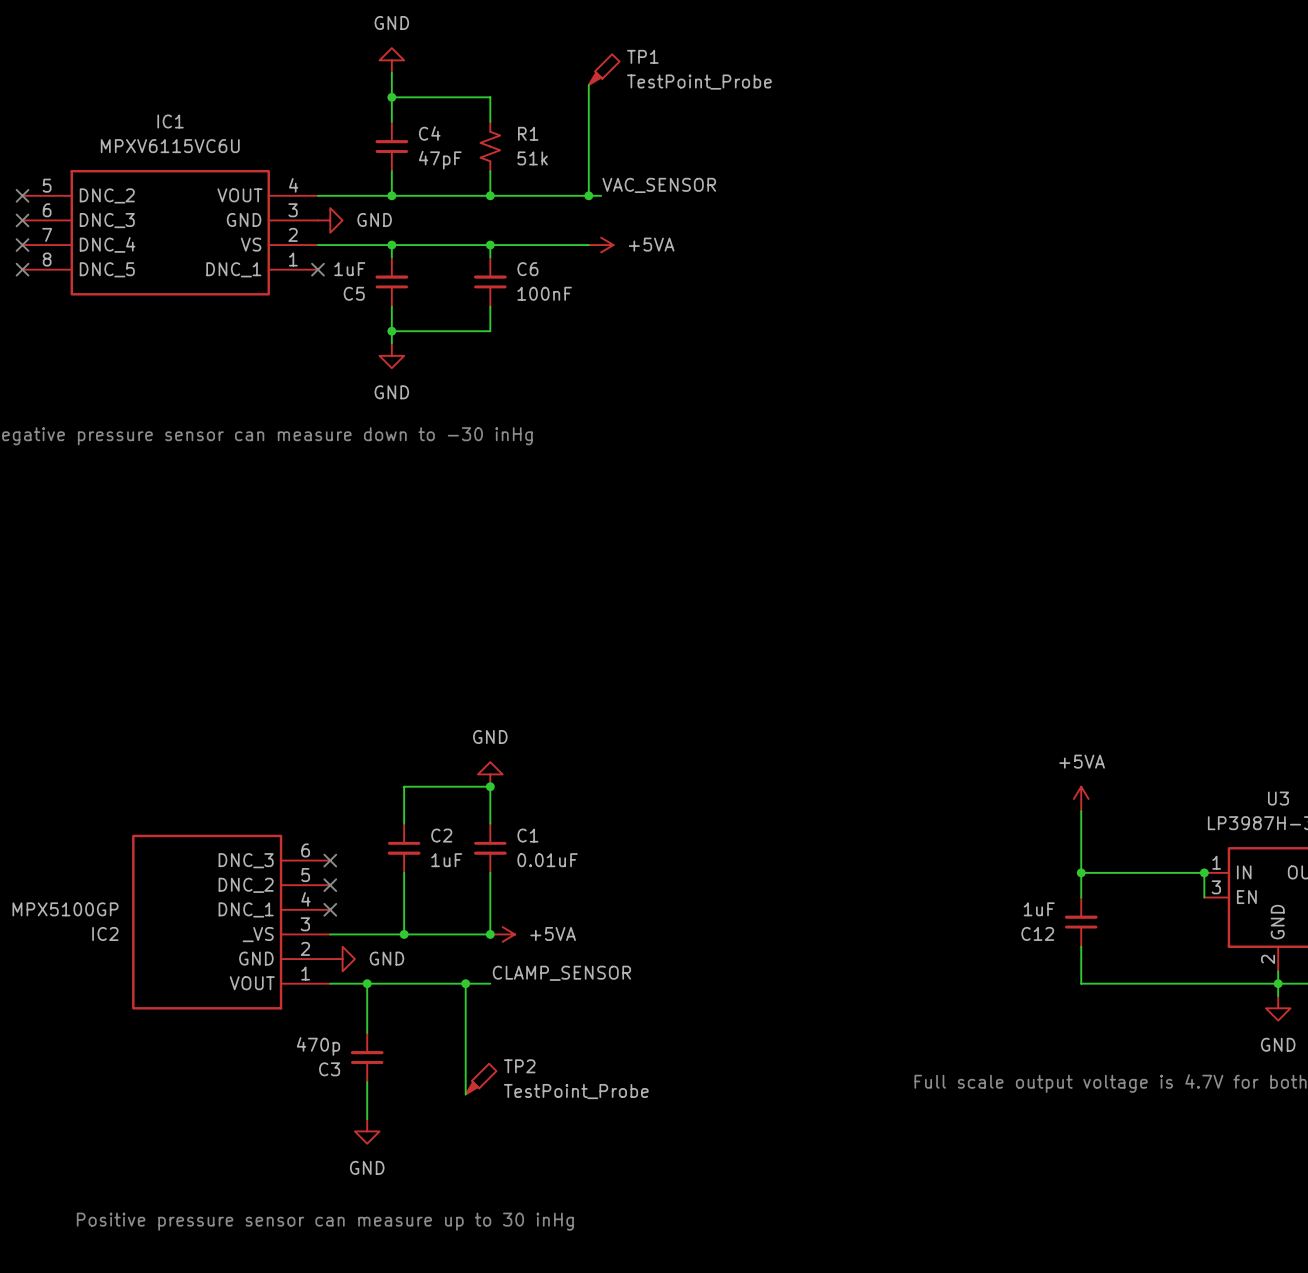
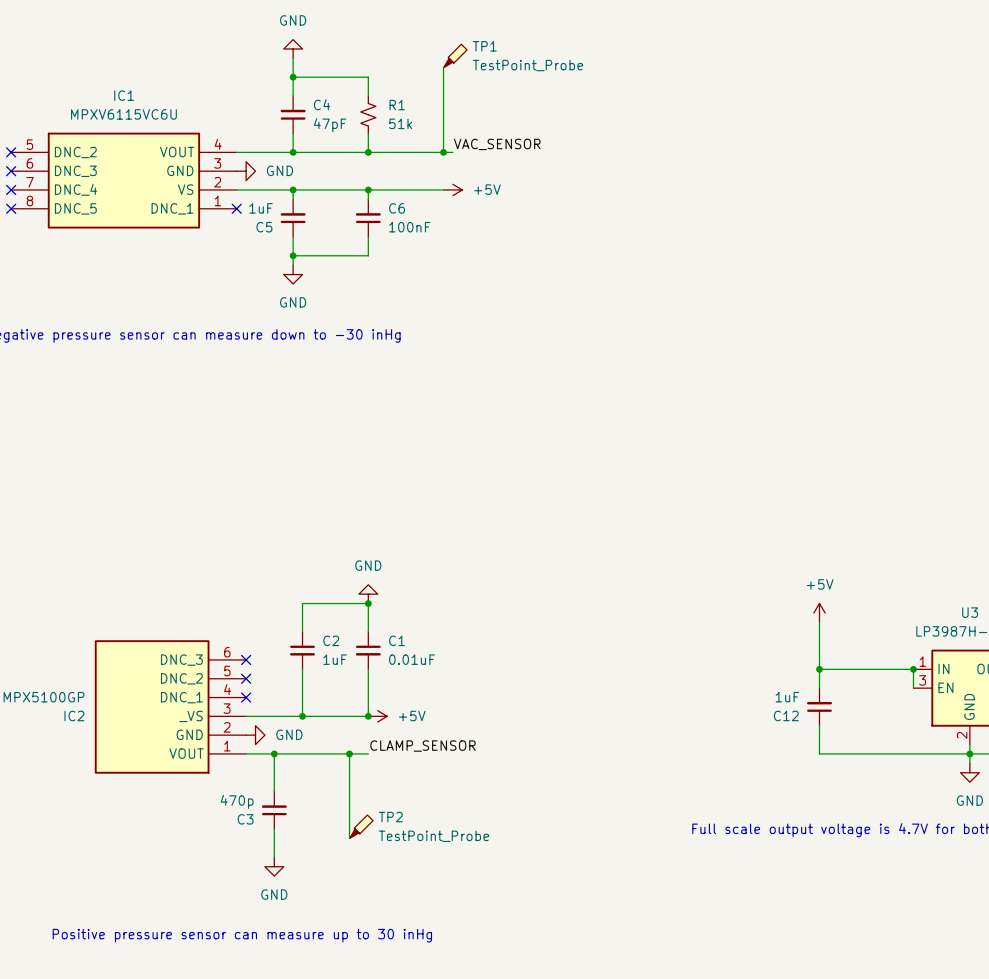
power symbol: +5VA (601, 245) -> +5V (452, 189)
power symbol: +5VA (1081, 799) -> +5V (819, 612)
power symbol: +5VA (502, 934) -> +5V (377, 716)

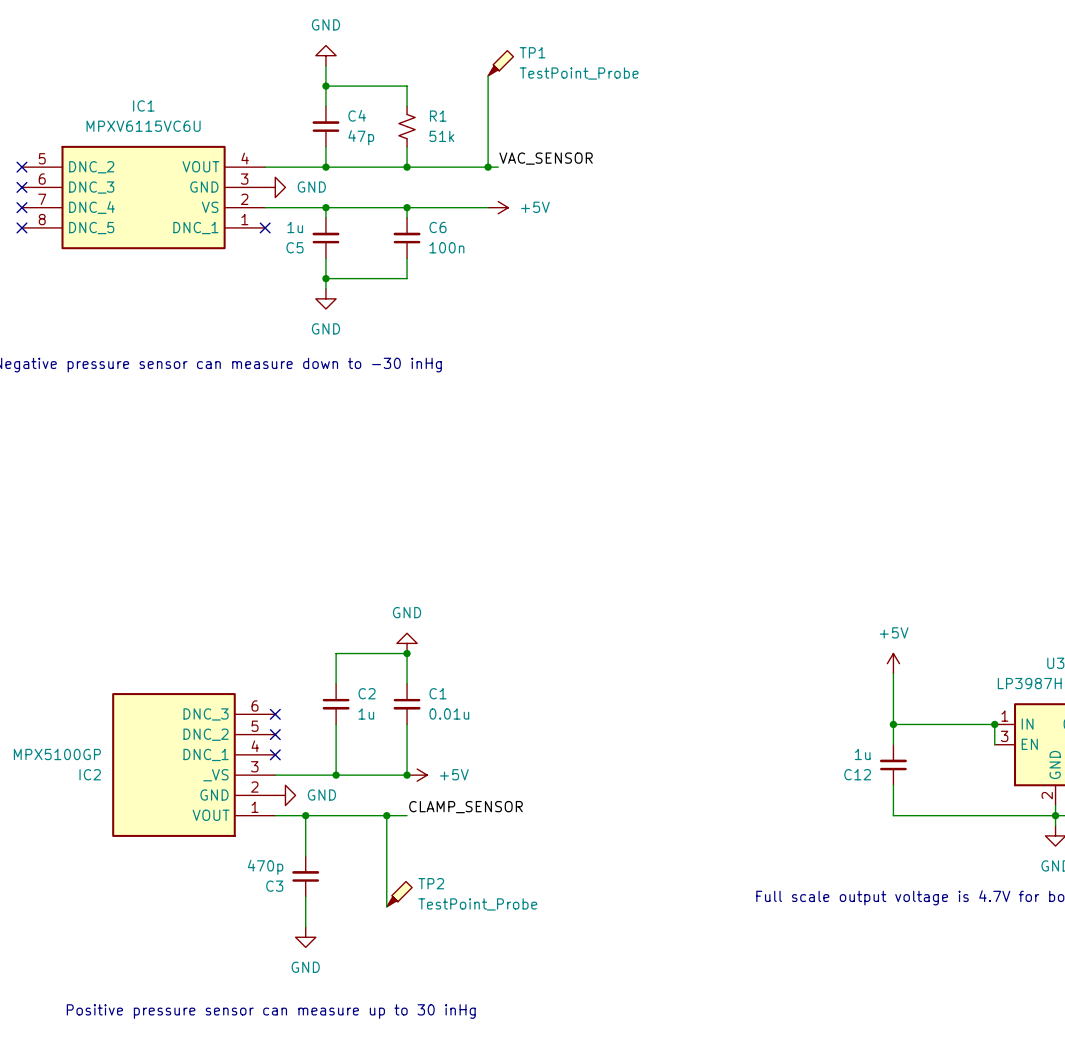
C4 value: 47pF (330, 125) -> 47p (361, 137)
C5 value: 1uF (261, 208) -> 1u (295, 227)
C6 value: 100nF (409, 227) -> 100n (446, 247)
C2 value: 1uF (335, 659) -> 1u (366, 714)
C1 value: 0.01uF (412, 659) -> 0.01u (449, 714)
C12 value: 1uF (787, 697) -> 1u (862, 754)

